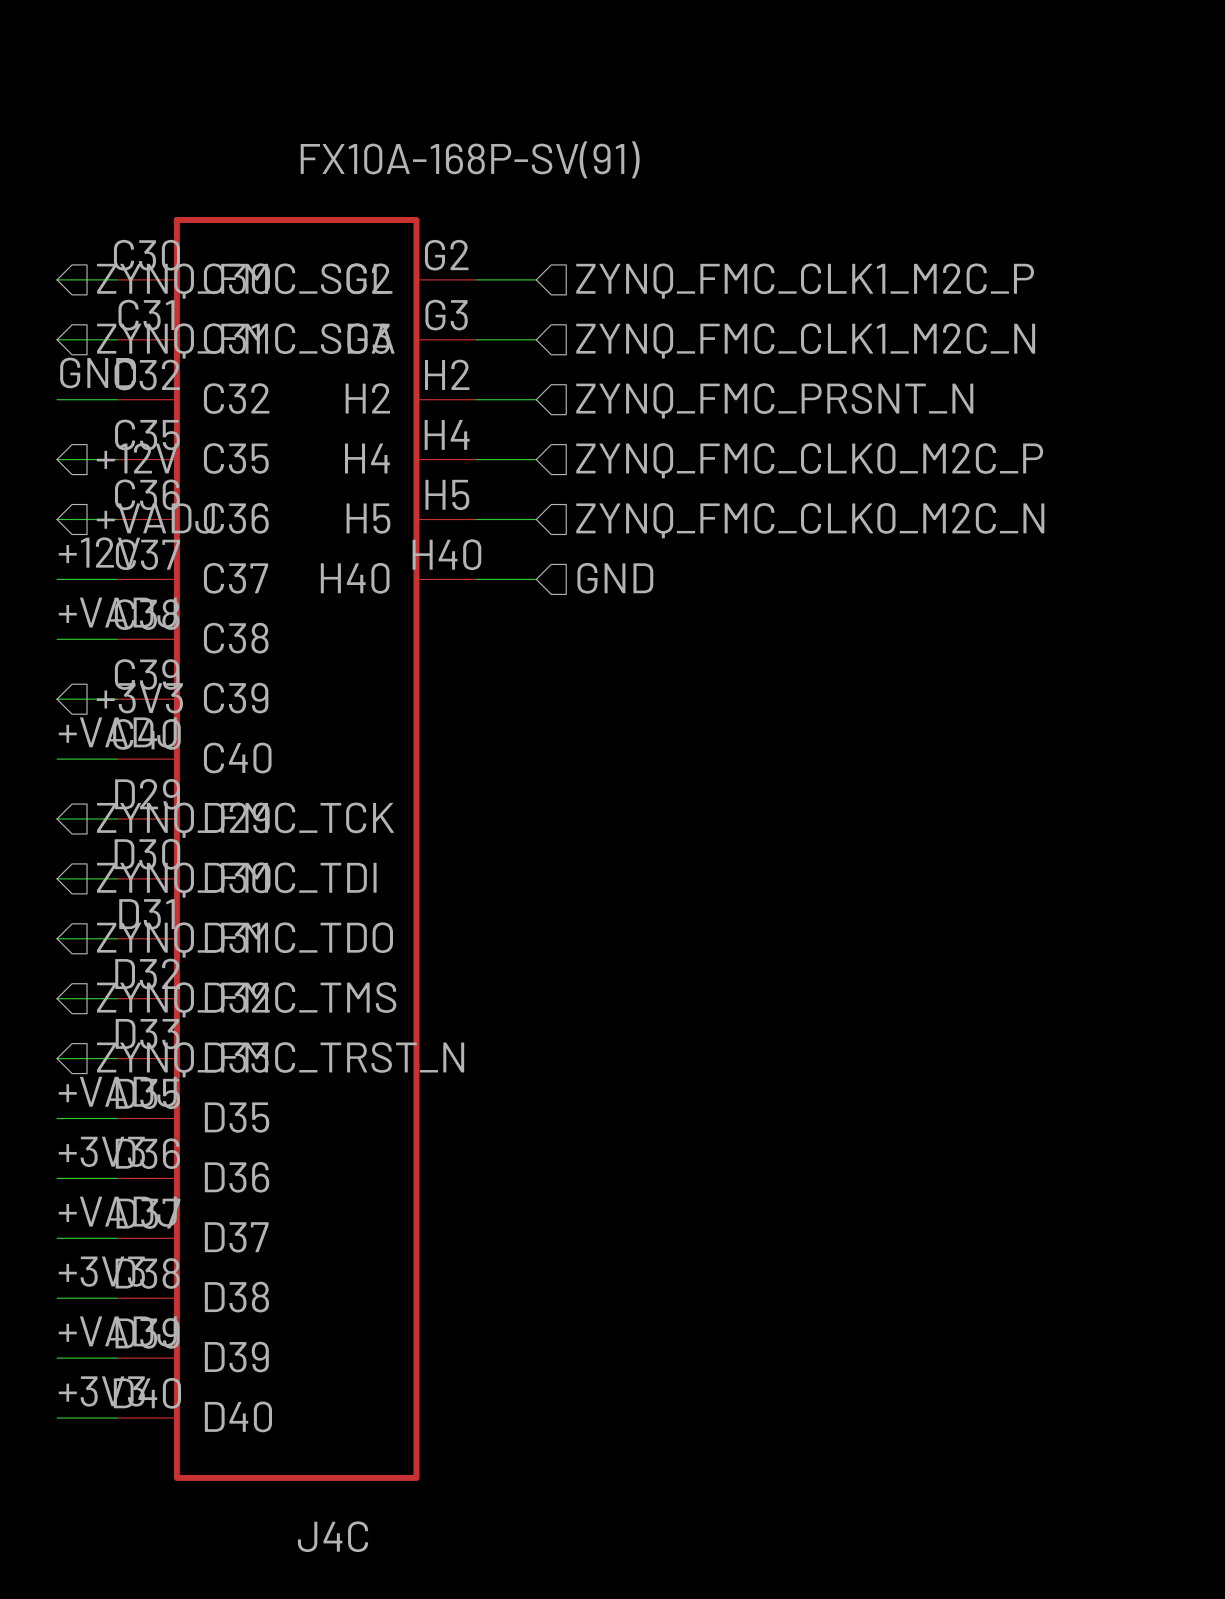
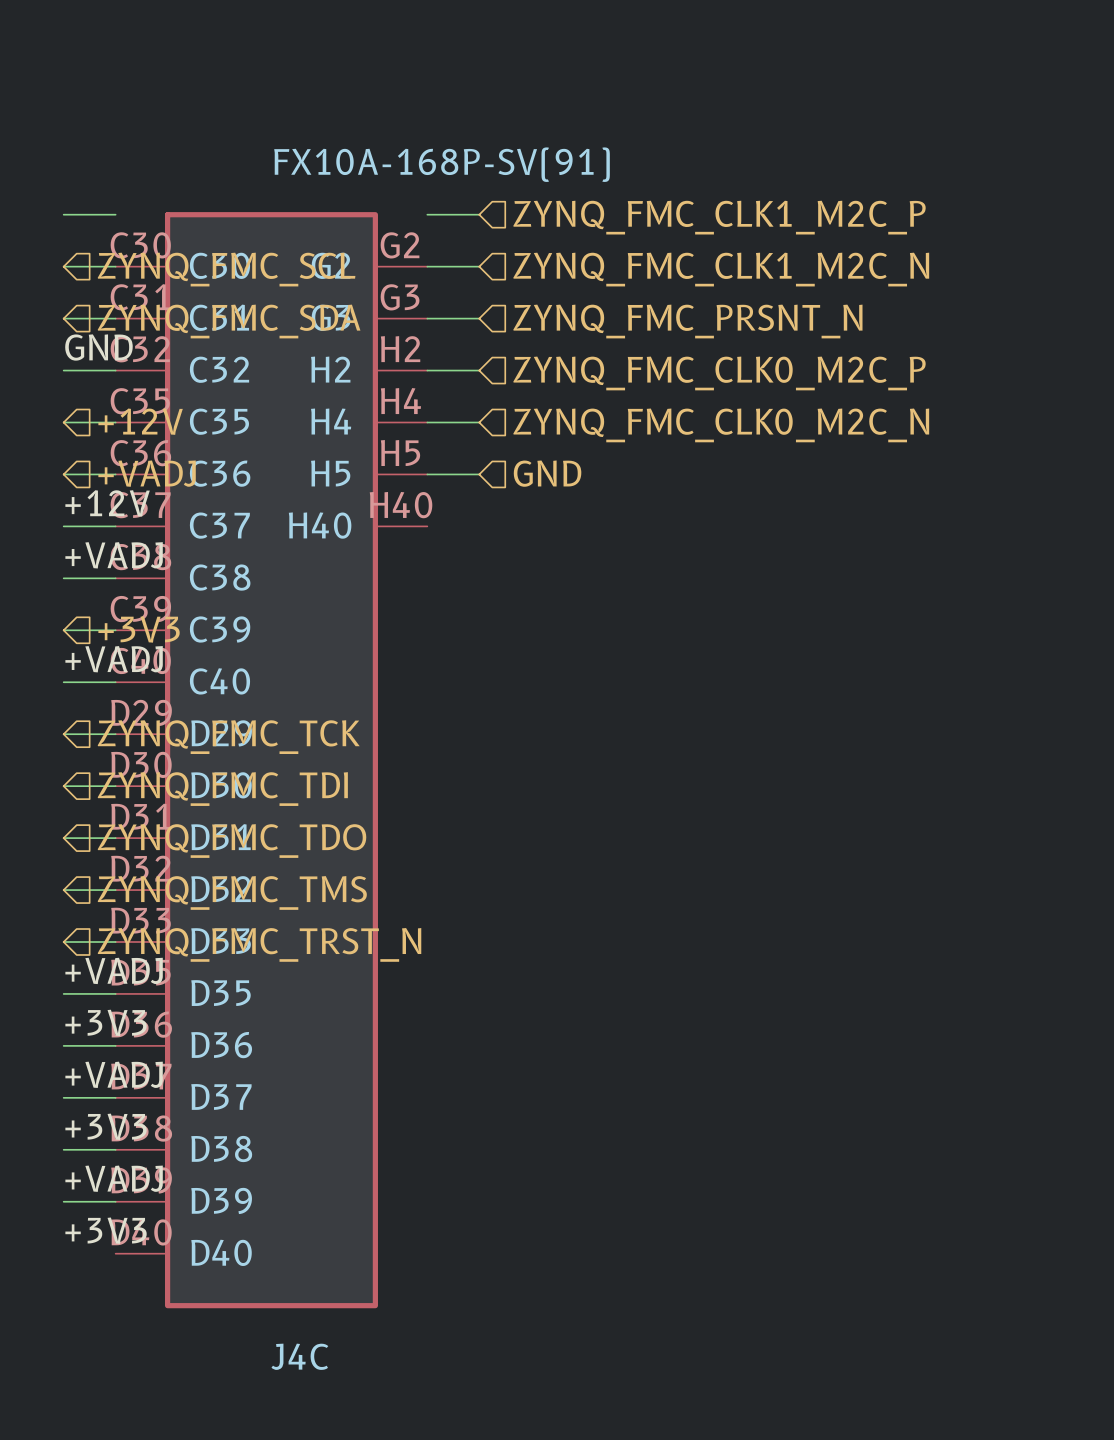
wire: none -> (63, 214) (115, 214)
hierarchical label: none -> ZYNQ_FMC_CLK1_M2C_P (719, 217)
hierarchical label: ZYNQ_FMC_CLK1_M2C_P (805, 281) -> ZYNQ_FMC_CLK1_M2C_N (721, 269)
hierarchical label: ZYNQ_FMC_CLK1_M2C_N (805, 340) -> ZYNQ_FMC_PRSNT_N (687, 321)
hierarchical label: ZYNQ_FMC_PRSNT_N (774, 400) -> ZYNQ_FMC_CLK0_M2C_P (719, 373)
hierarchical label: ZYNQ_FMC_CLK0_M2C_P (809, 460) -> ZYNQ_FMC_CLK0_M2C_N (721, 425)
hierarchical label: ZYNQ_FMC_CLK0_M2C_N (810, 520) -> GND (547, 473)
hierarchical label: GND (615, 578) -> none
wire: (476, 579) (536, 579) -> (427, 214) (479, 214)
wire: (57, 1418) (116, 1418) -> none

